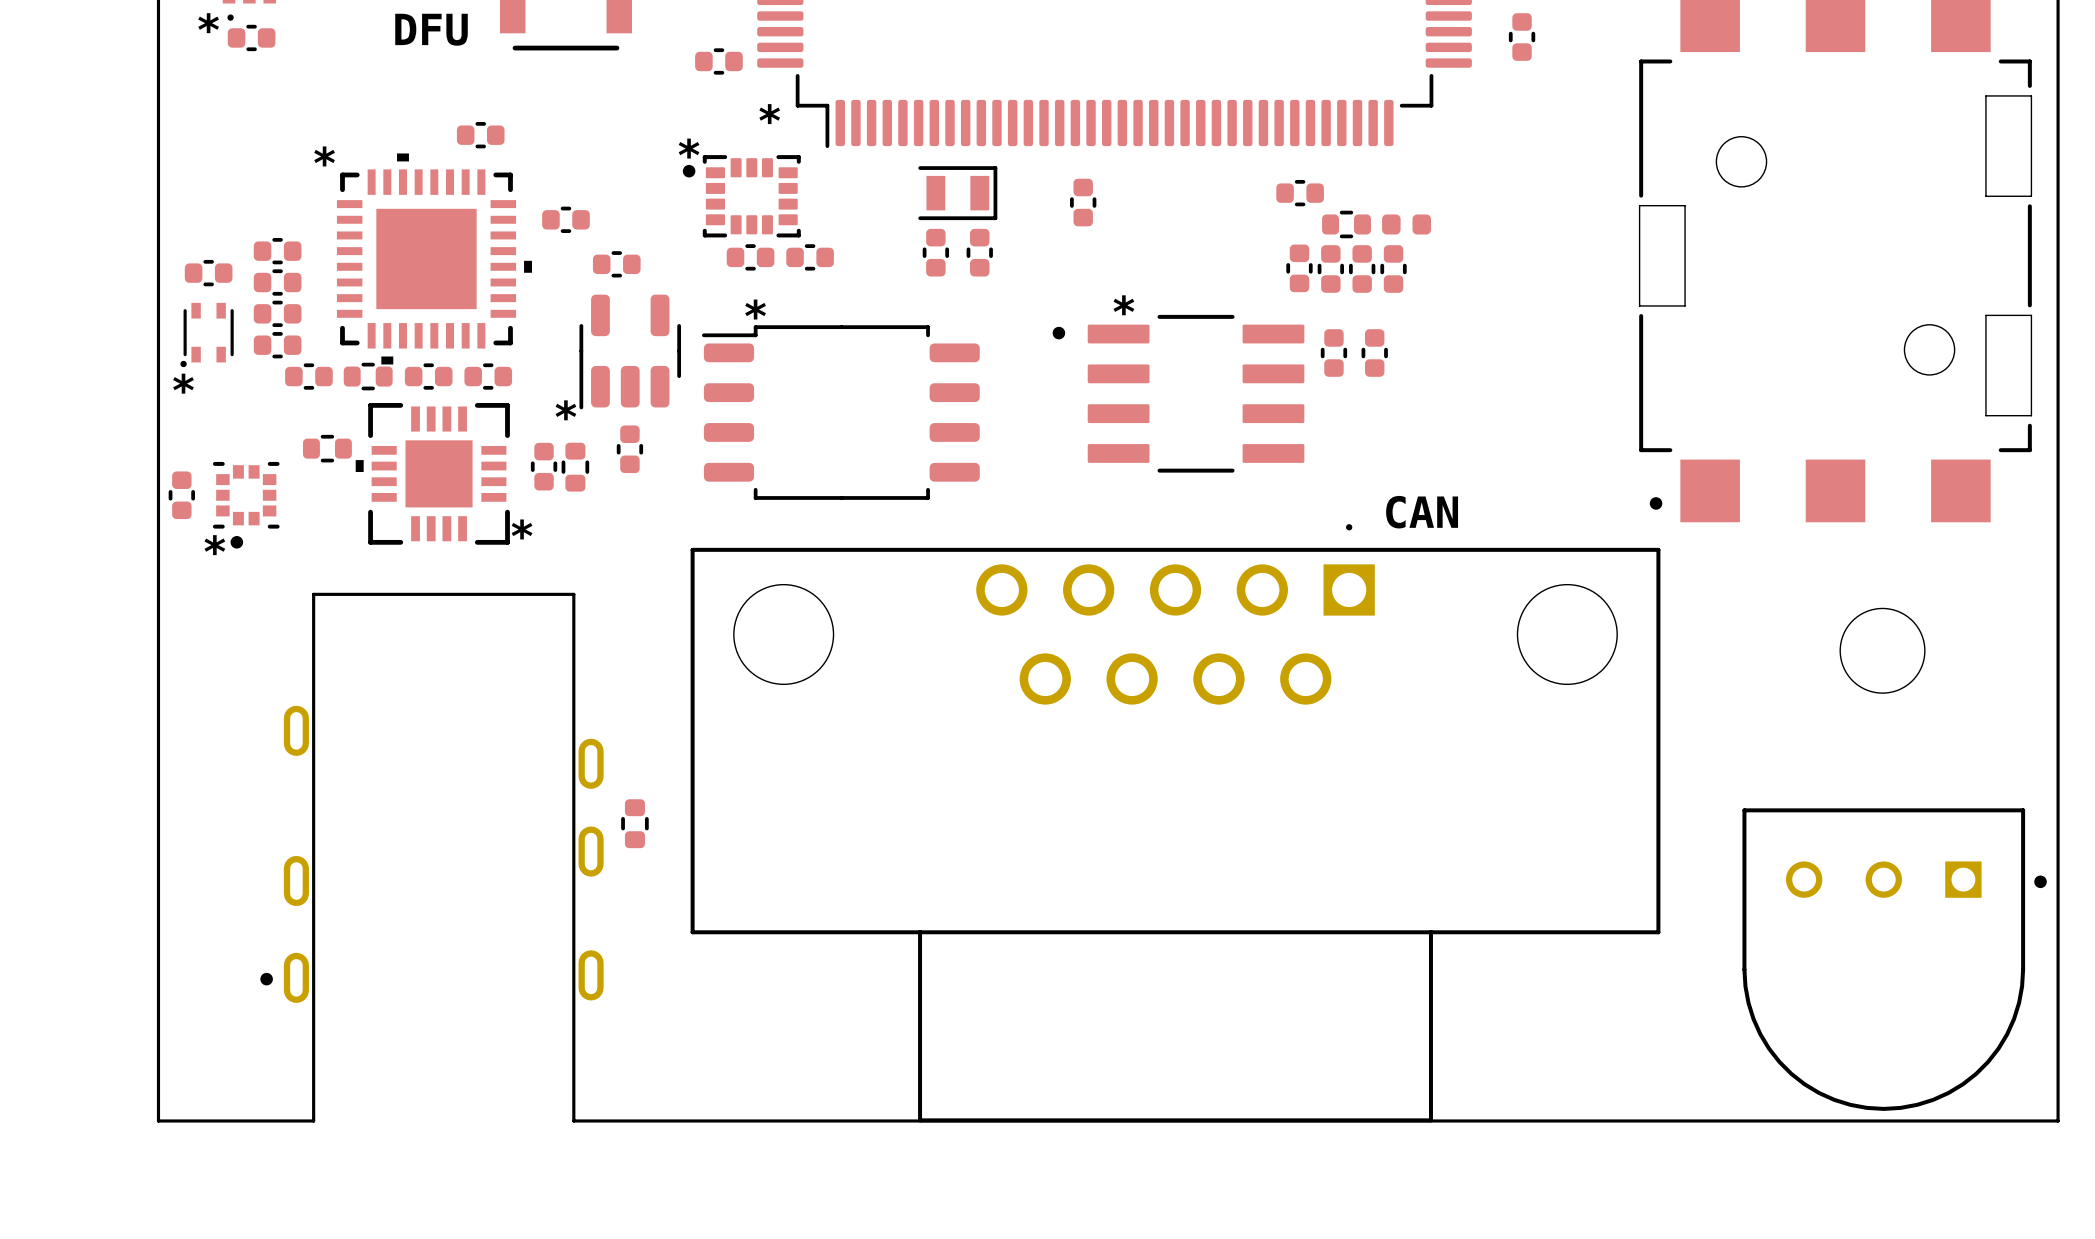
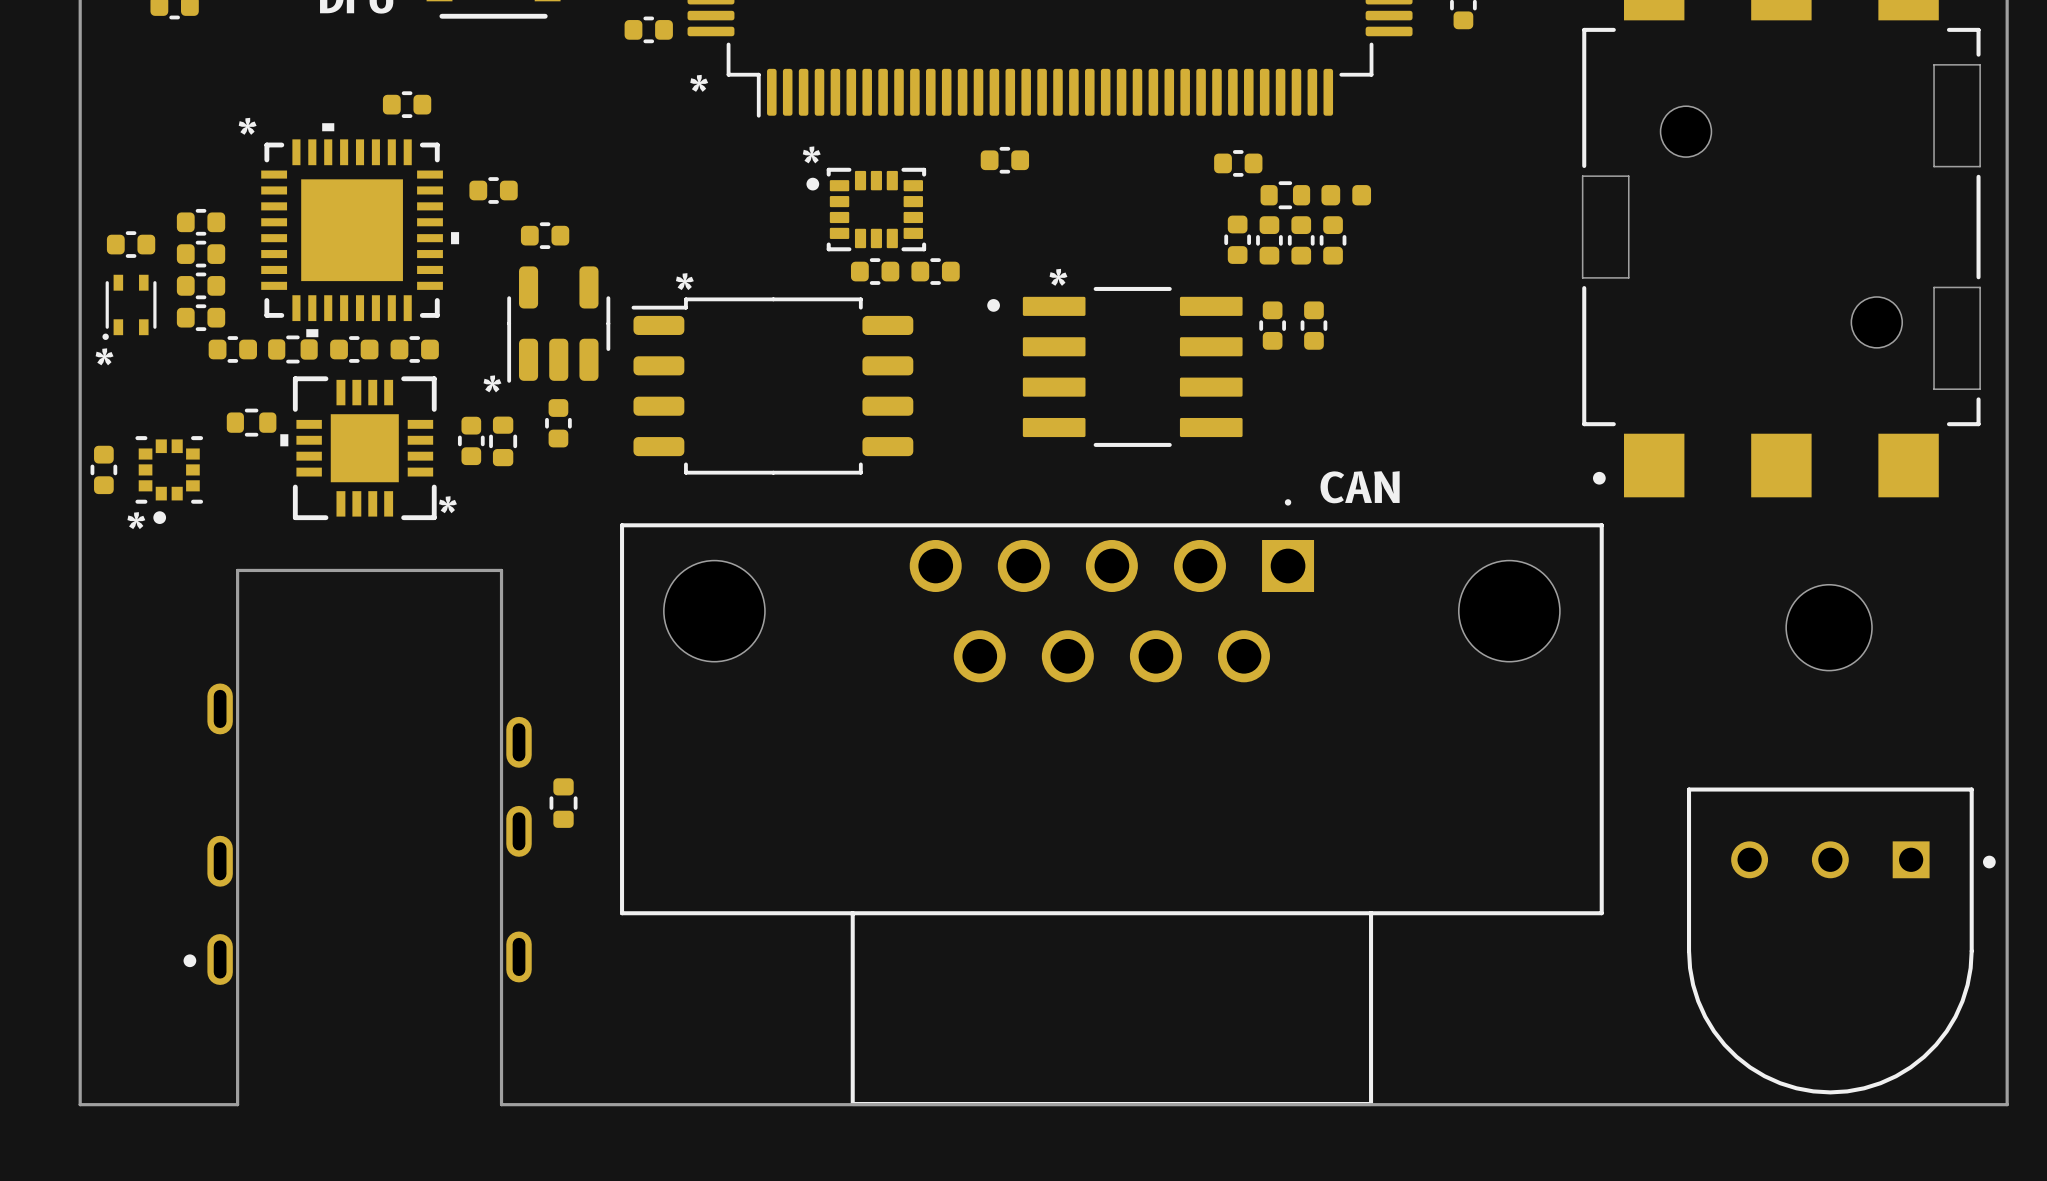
text position: * (689, 148) -> * (811, 154)
part: (957, 193) -> none
part: (741, 196) -> none
part rotation: 0° (1083, 202) -> 90° clockwise (1004, 160)
part footprint: [922, 228, 950, 277] -> [806, 167, 927, 252]
part: (979, 252) -> none
part: (750, 257) -> none
part: (810, 257) -> none
part: none -> (875, 271)
part: none -> (935, 271)

